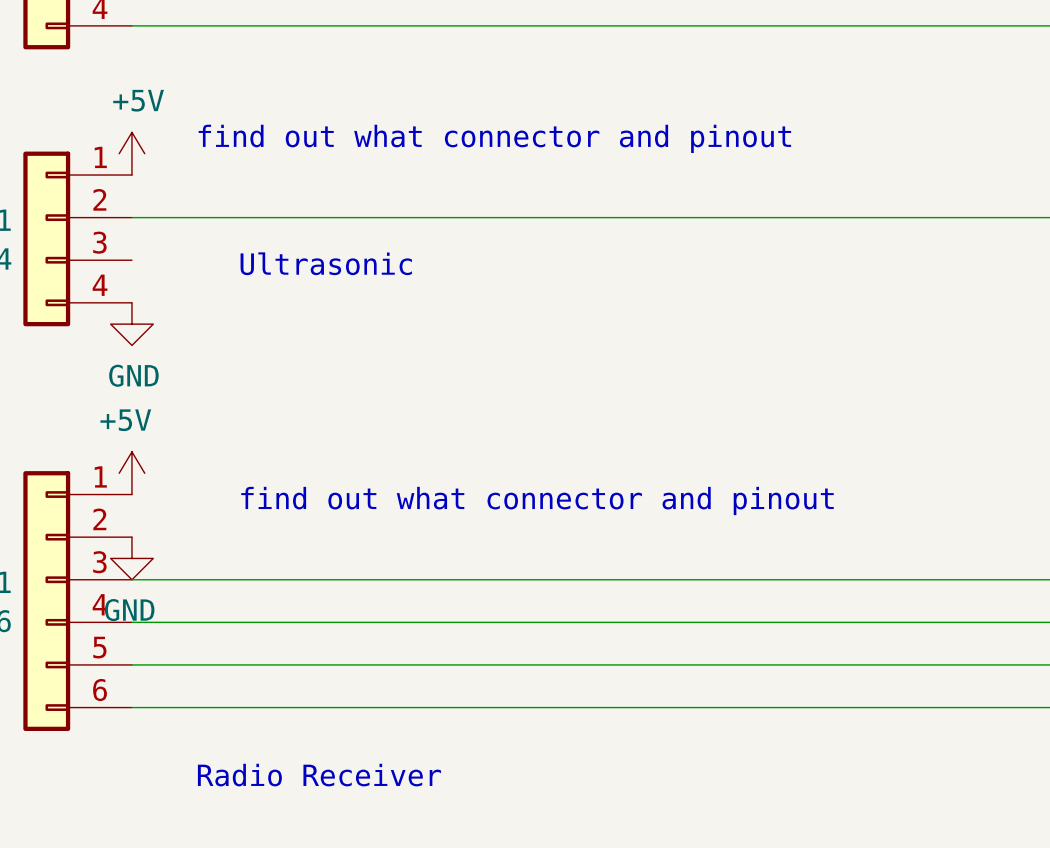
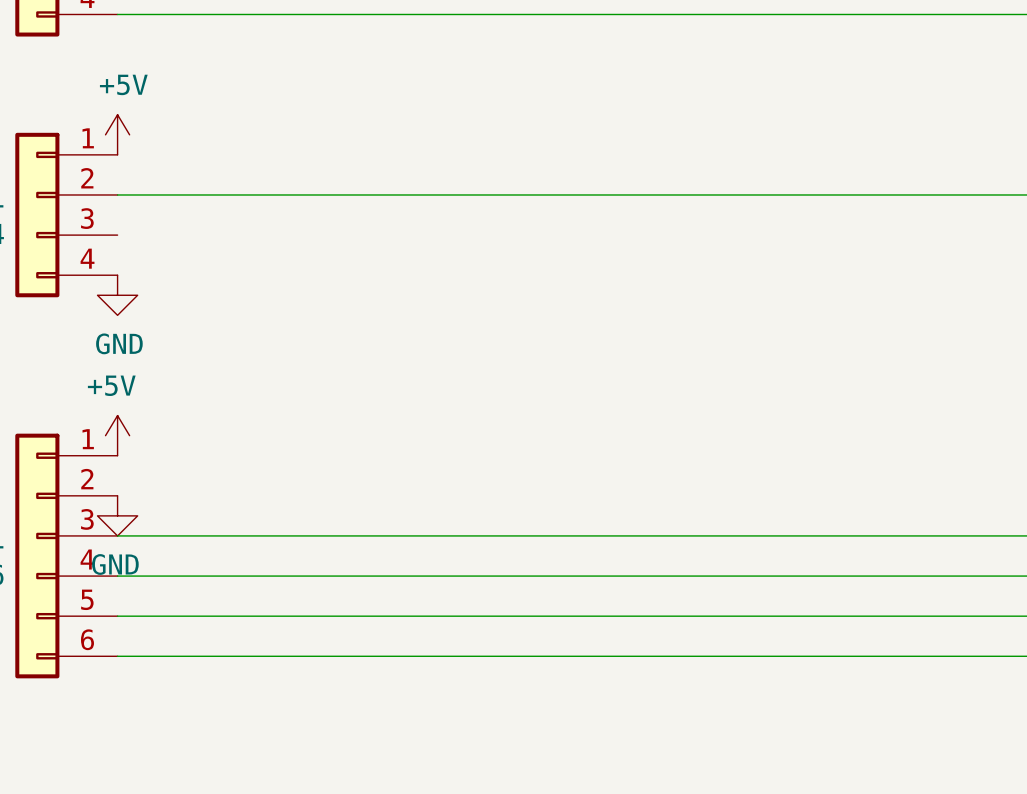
text: find out what connector and pinout (494, 138) -> none
text: Ultrasonic (326, 263) -> none
text: find out what connector and pinout (537, 500) -> none
text: Radio Receiver (319, 775) -> none

